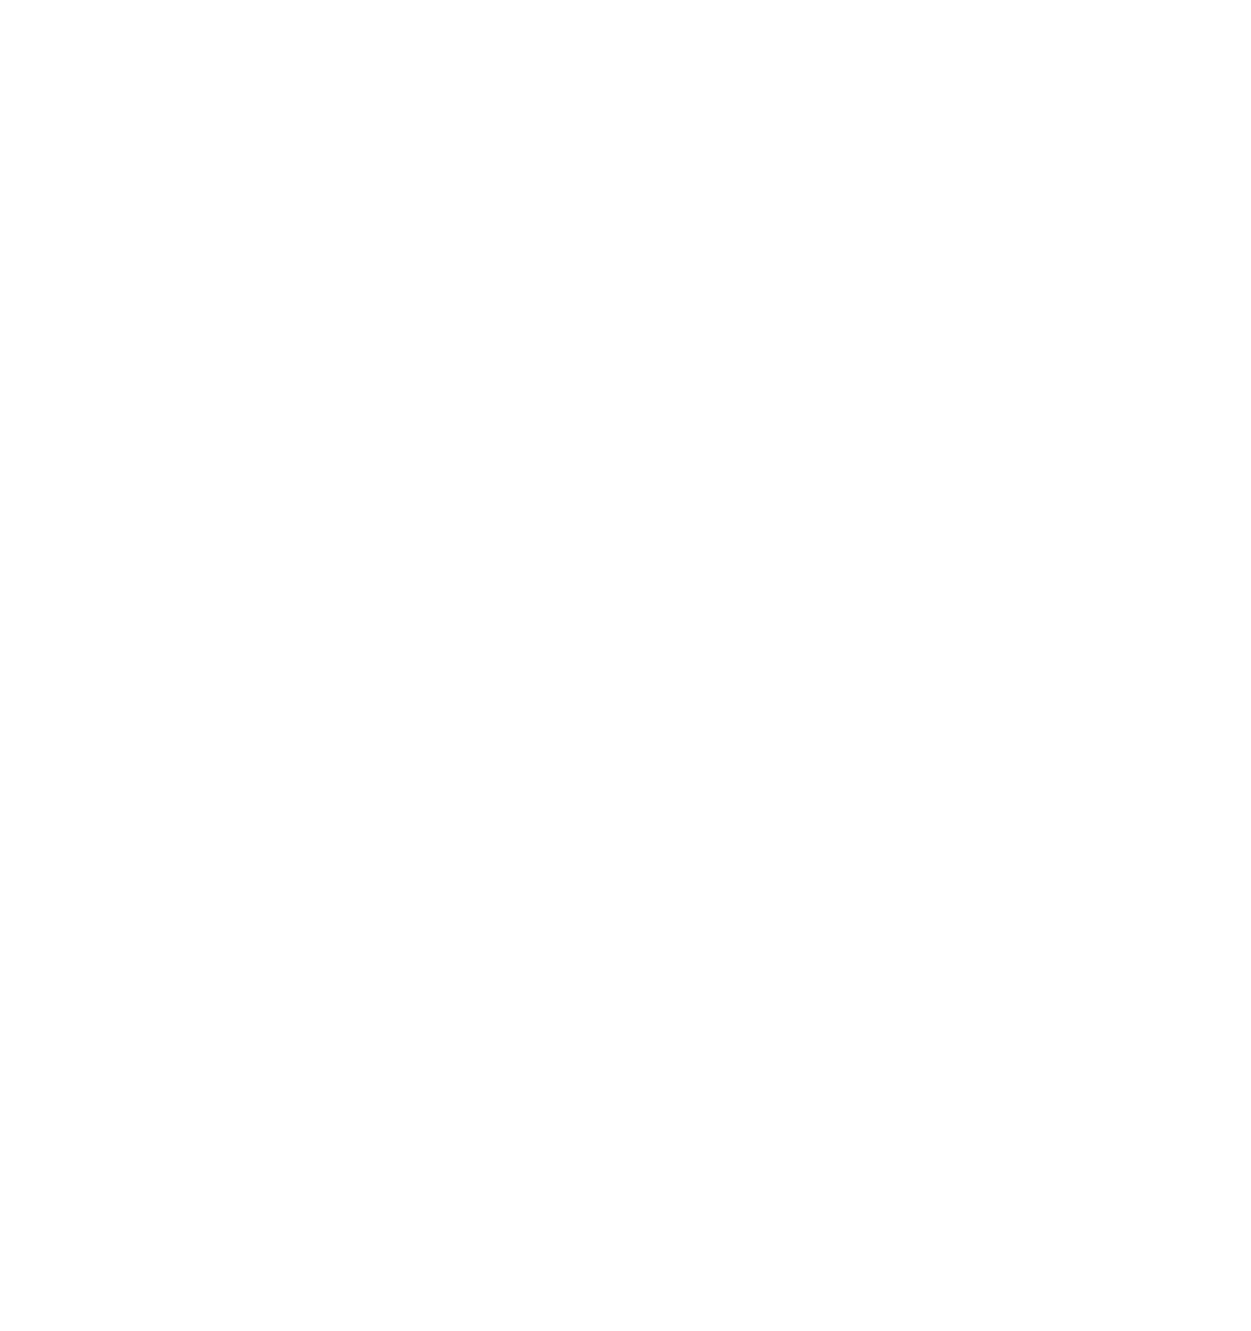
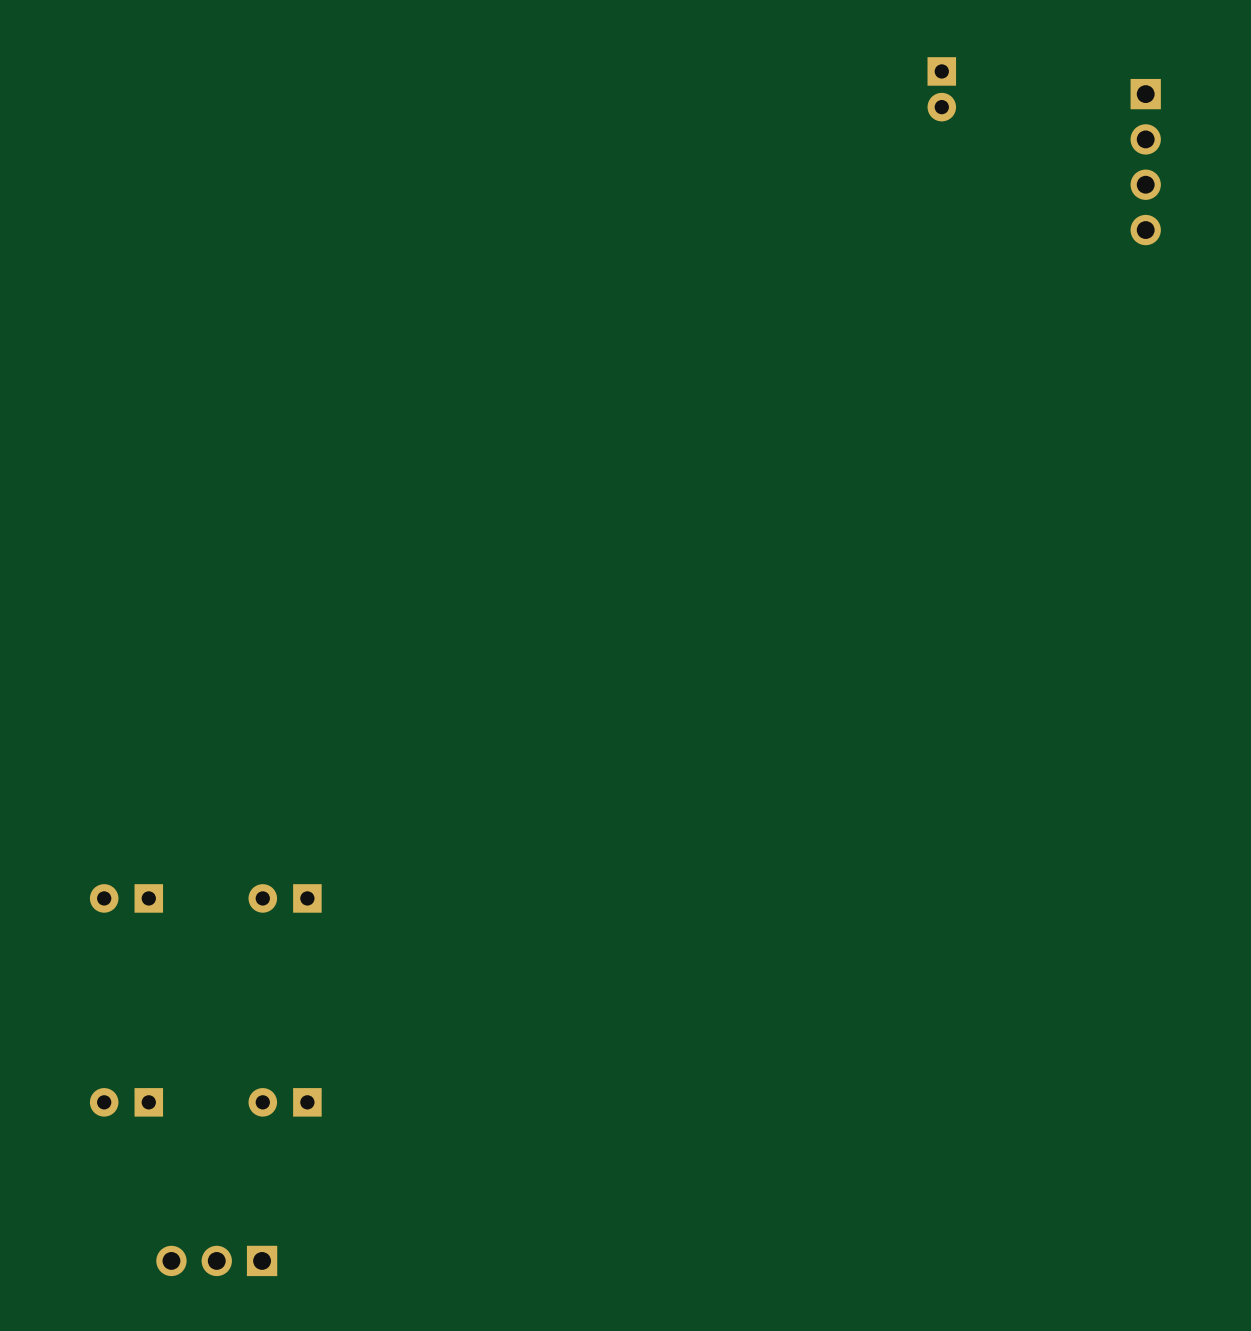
part: none -> (941, 89)
part: none -> (1145, 162)
part: none -> (126, 898)
part: none -> (285, 898)
part: none -> (126, 1102)
part: none -> (285, 1102)
part: none -> (216, 1260)

